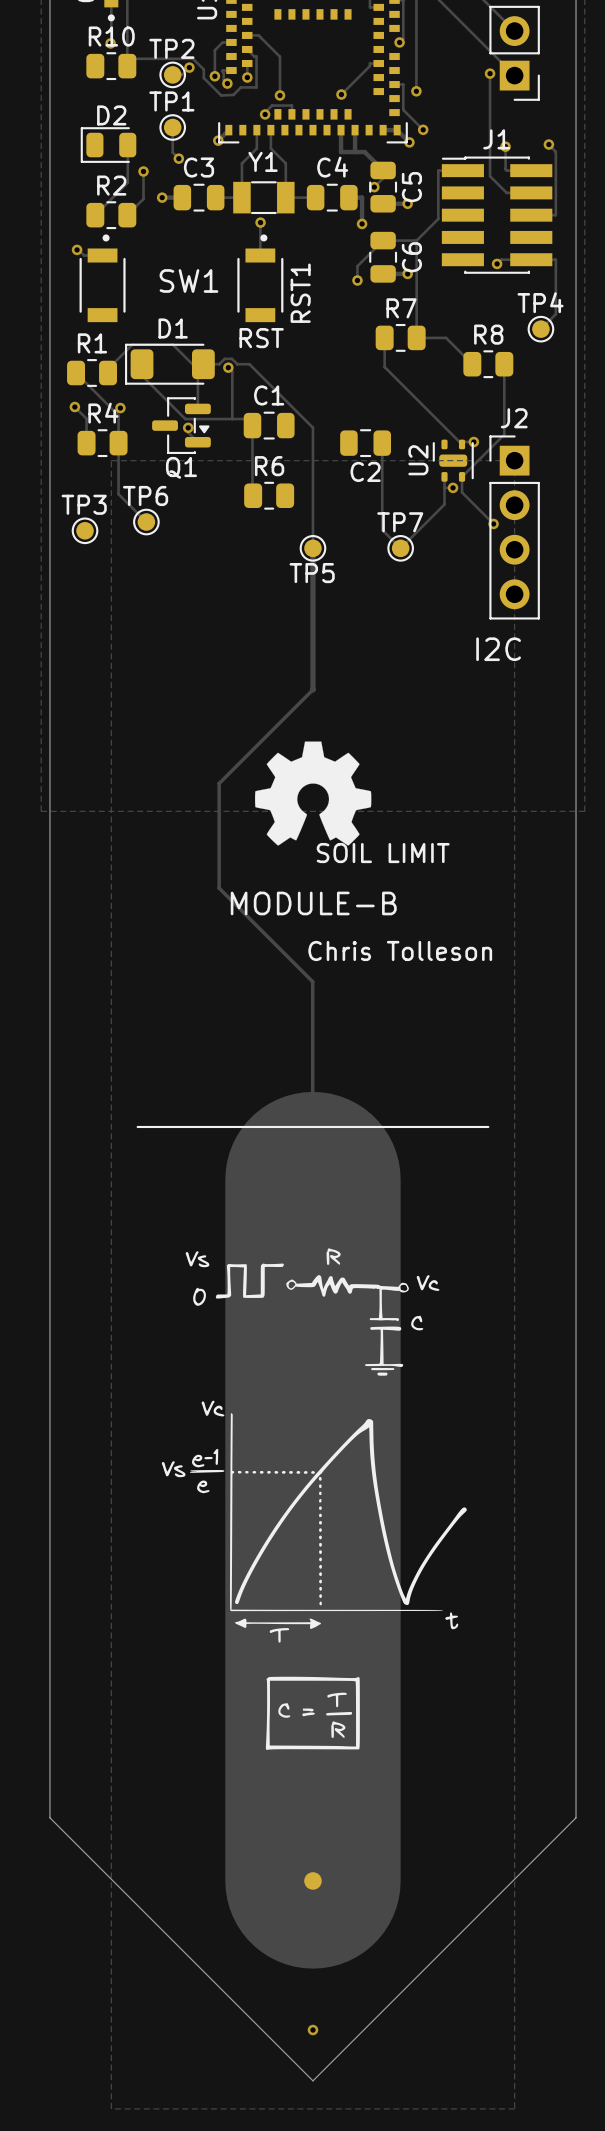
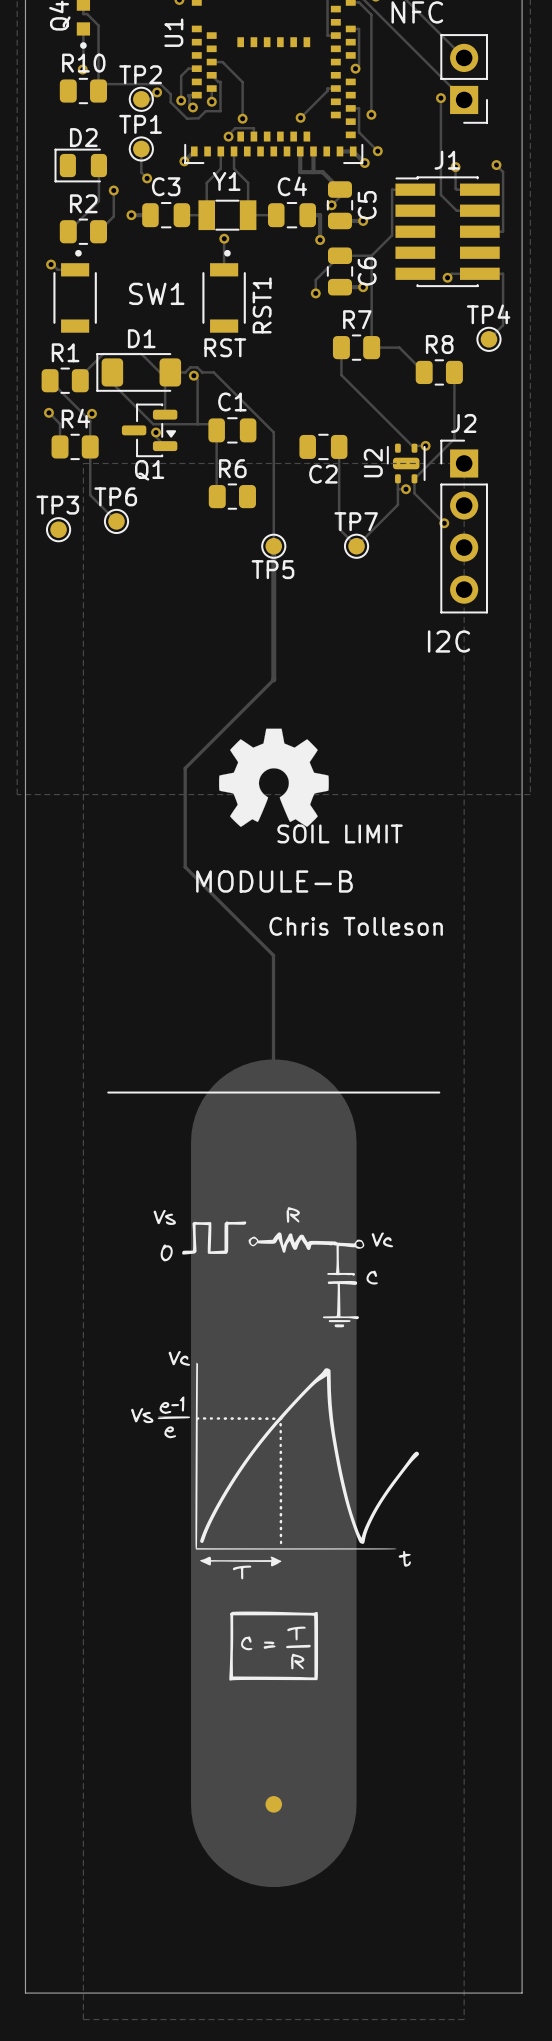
board edge: (49, 1817) (312, 2080) (576, 1817) -> (25, 1744) (25, 1993) (522, 1993) (522, 1744)
via: (312, 2030) -> none

